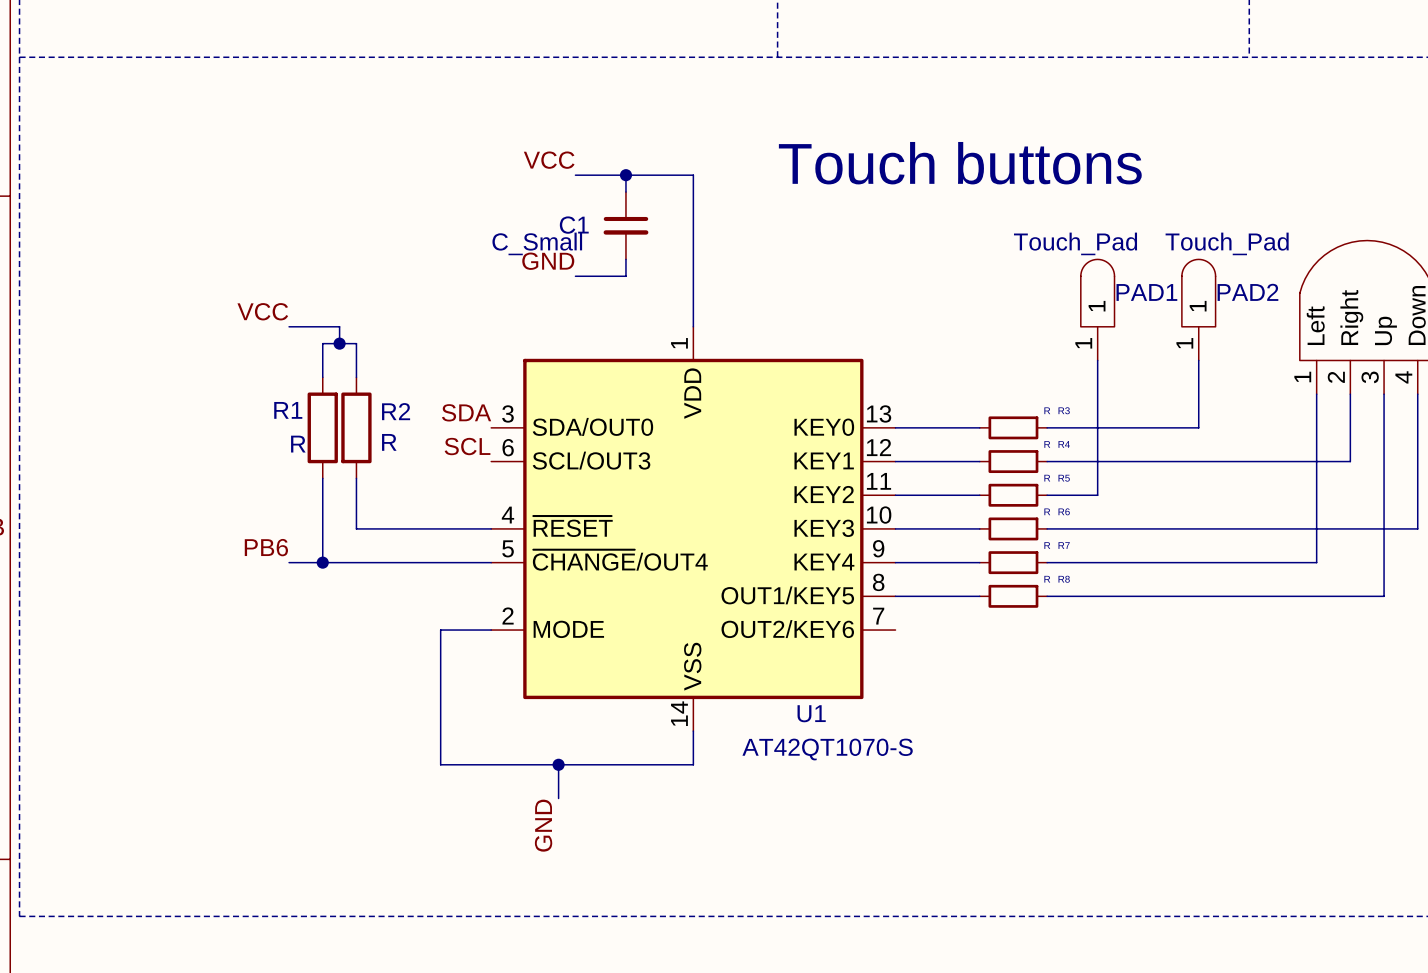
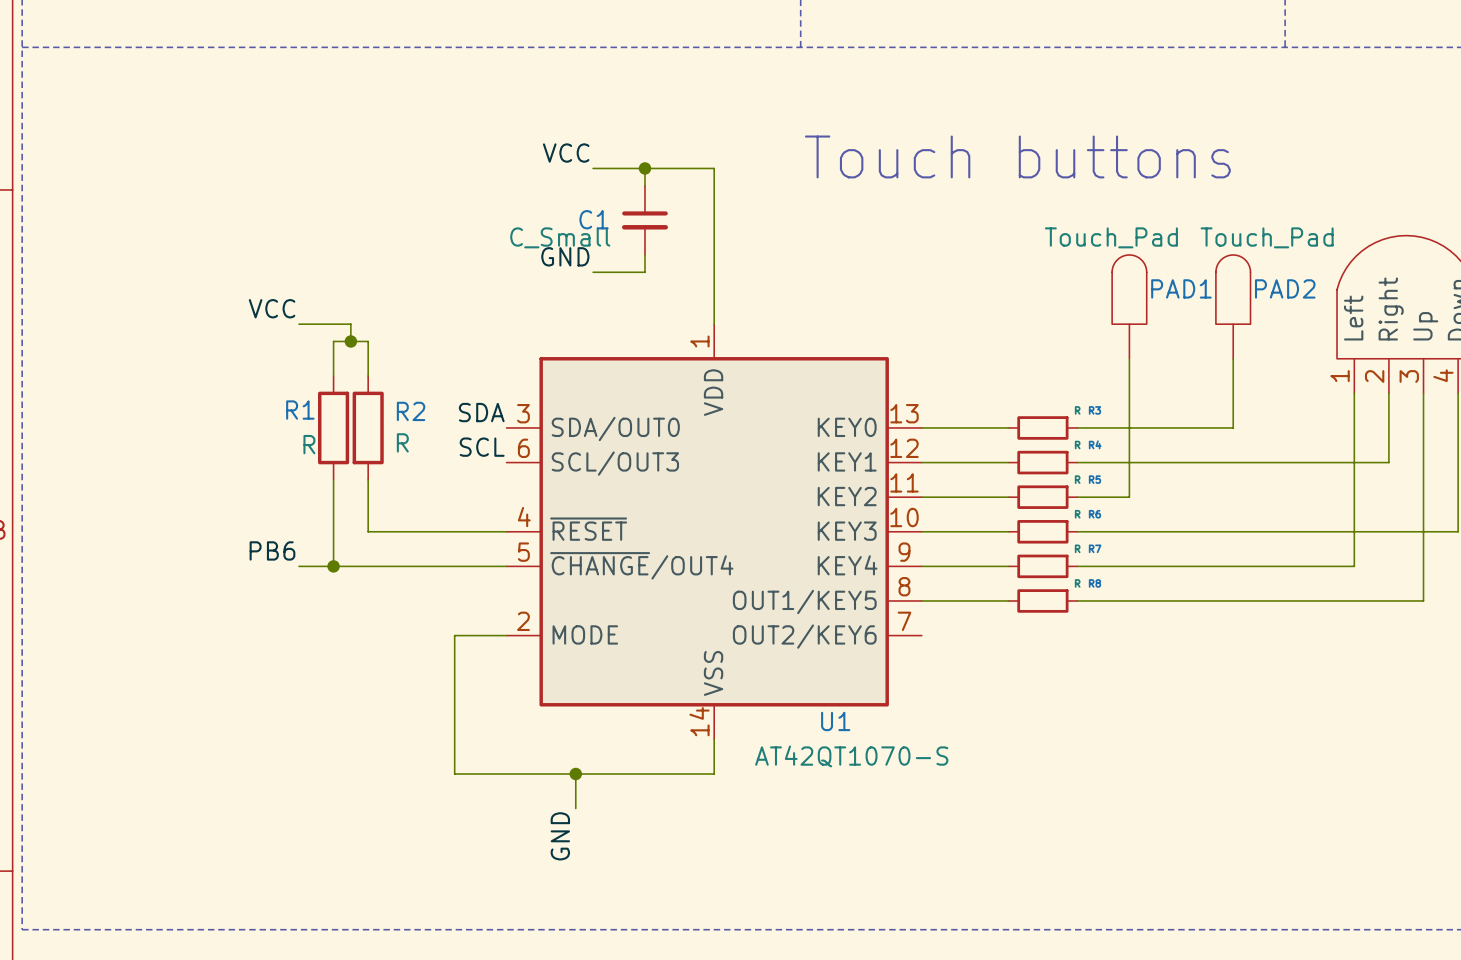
PAD1 pin name: 1 (1097, 306) -> none
PAD2 pin name: 1 (1198, 306) -> none
PAD1 pin number: 1 (1083, 343) -> none
PAD2 pin number: 1 (1184, 343) -> none

